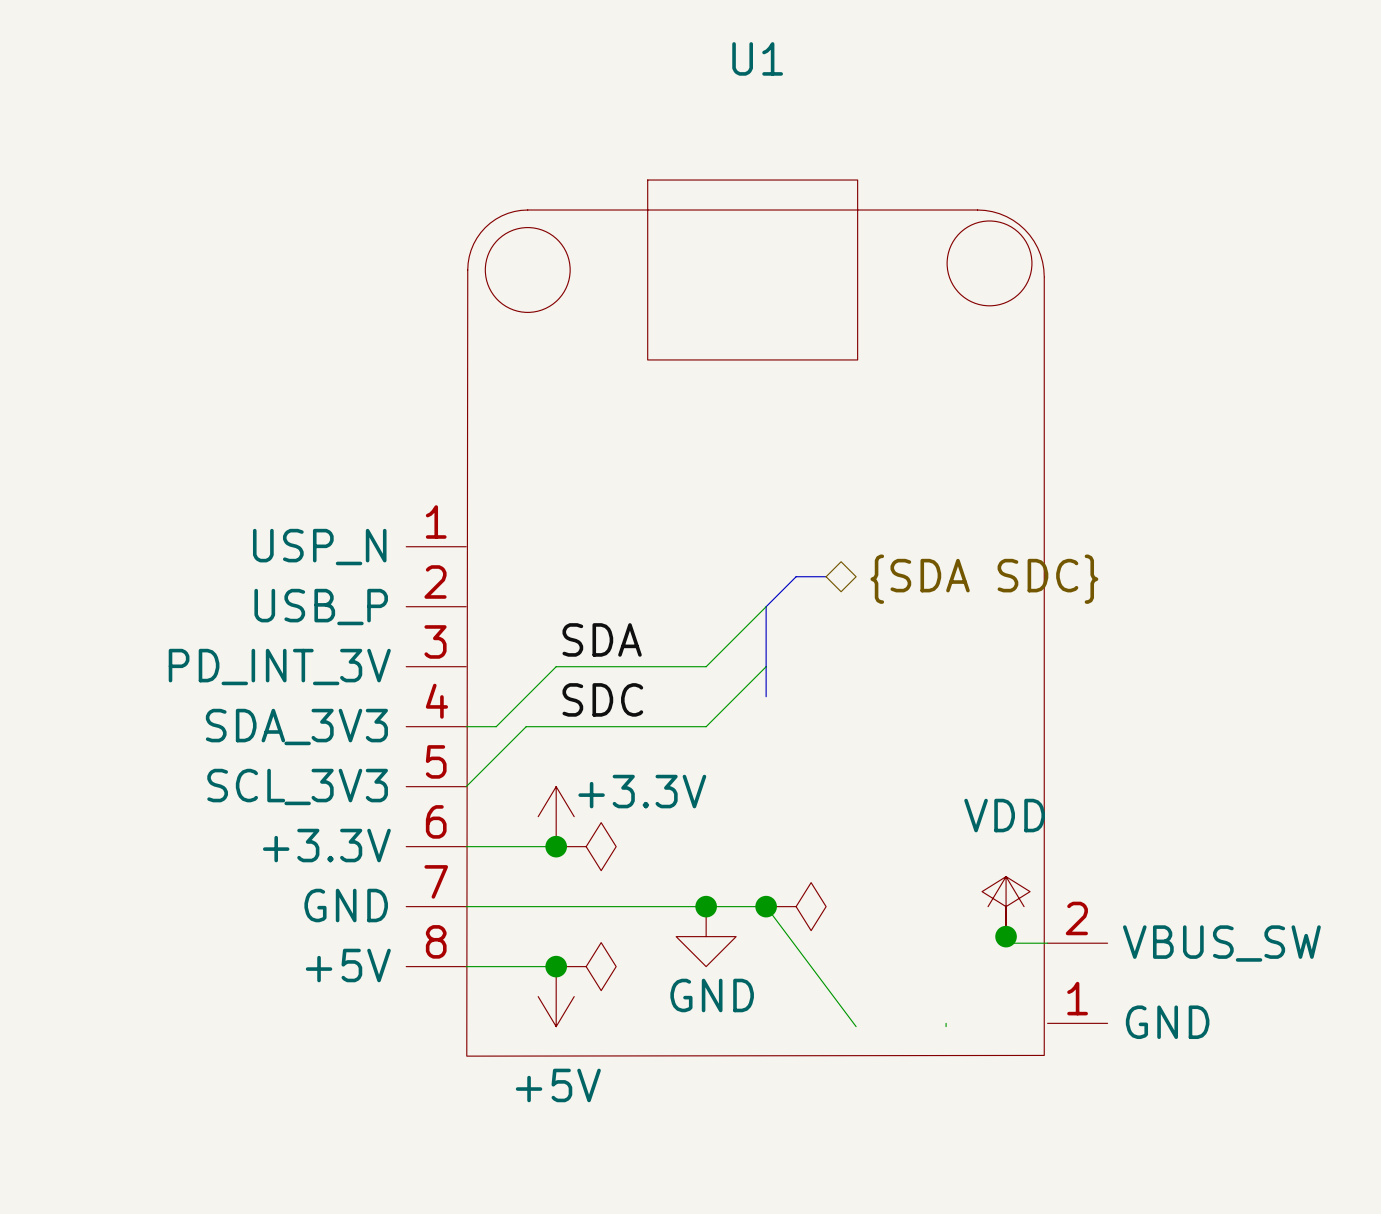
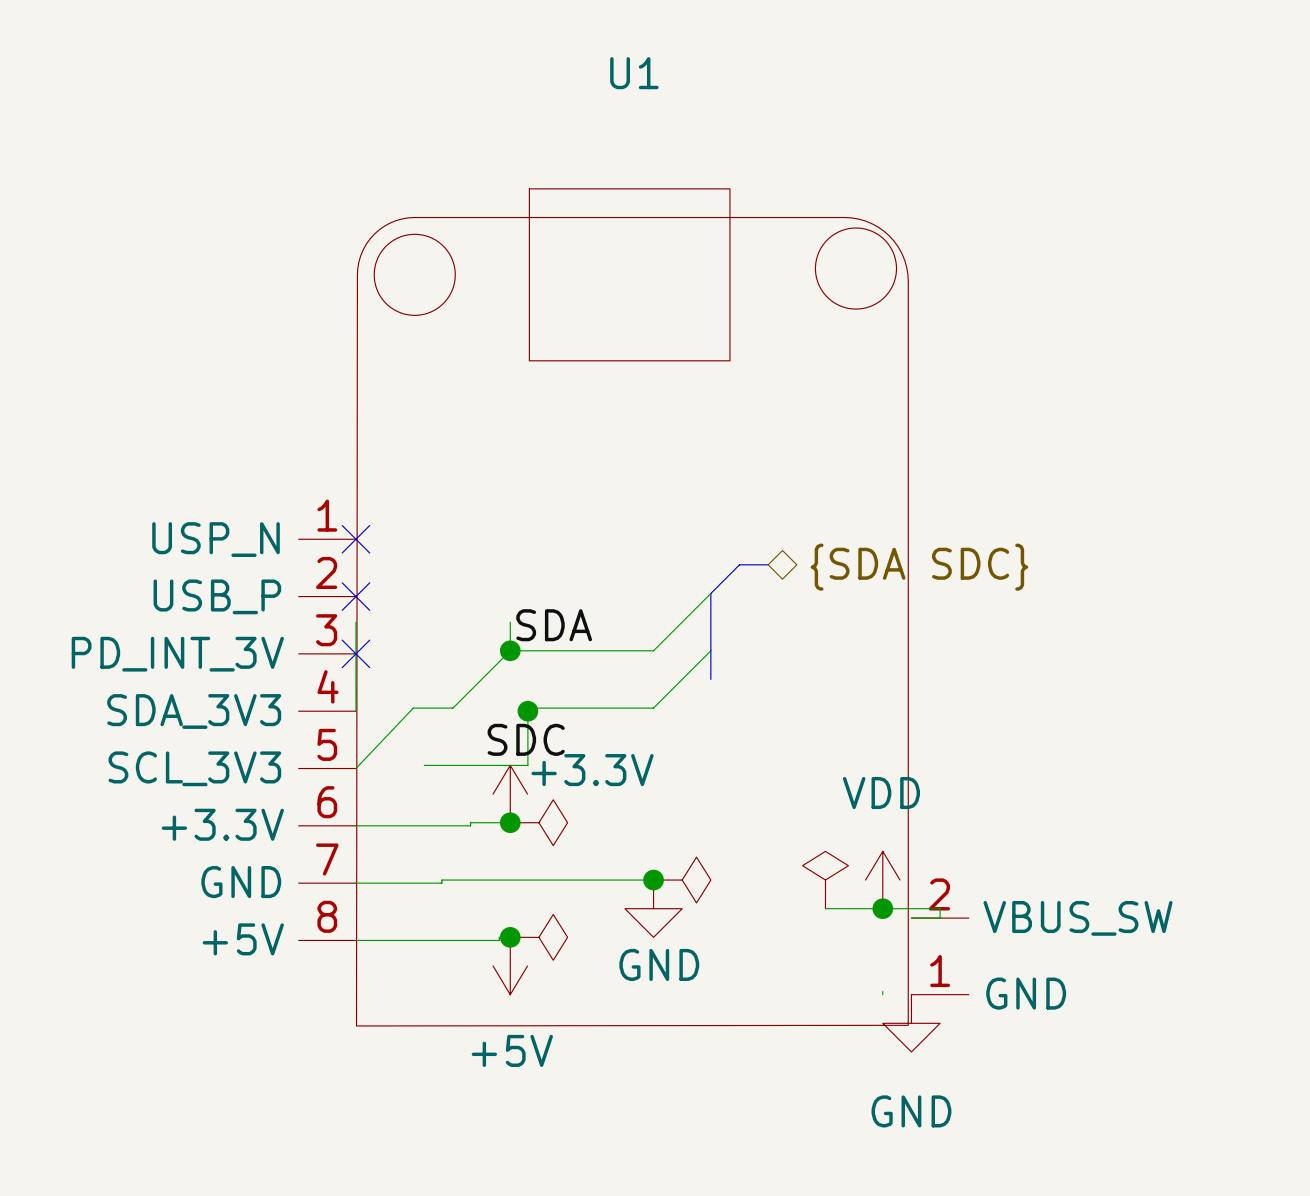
no-connect mark: none -> (355, 539)
no-connect mark: none -> (355, 596)
U1 position: (756, 618) -> (633, 607)
wire: none -> (355, 622) (355, 711)
wire: none -> (510, 622) (510, 650)
junction: none -> (510, 650)
no-connect mark: none -> (355, 653)
label position: SDC (602, 699) -> SDC (526, 739)
wire: none -> (424, 708) (413, 708) (355, 768)
wire: (574, 726) (526, 726) (466, 786) -> (527, 708) (527, 765) (424, 765)
junction: none -> (527, 711)
wire: (466, 846) (514, 846) -> (355, 825) (470, 825) (470, 822)
wire: (466, 906) (484, 906) -> (355, 883) (441, 883) (441, 880)
wire: (706, 906) (766, 906) (856, 1026) -> none
power symbol: none -> (682, 880)
junction: (766, 906) -> none
power symbol: (796, 906) -> none
power symbol: none -> (825, 880)
power symbol position: VDD (1006, 906) -> VDD (882, 880)
power symbol: (1006, 906) -> none
wire: none -> (825, 908) (940, 908)
junction position: (1006, 936) -> (882, 908)
wire: (1006, 943) (1047, 943) -> (940, 914) (940, 918) (911, 918)
wire: (466, 966) (544, 966) -> (355, 940) (499, 940) (499, 937)
power symbol: none -> GND (911, 1023)

